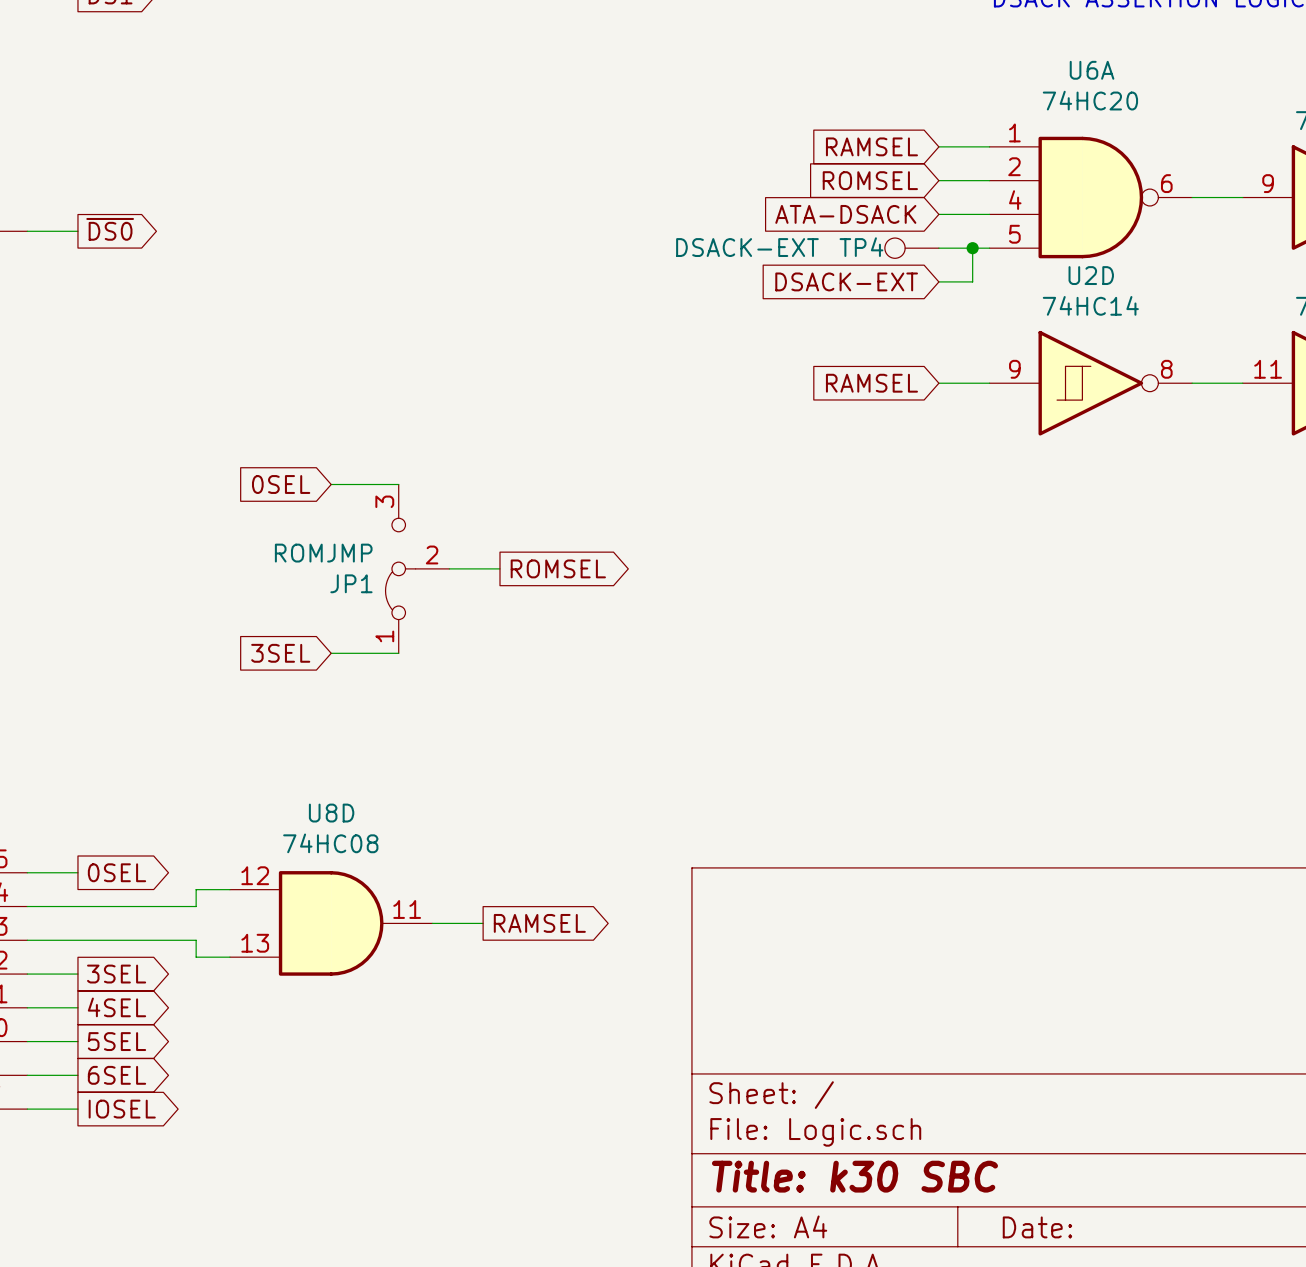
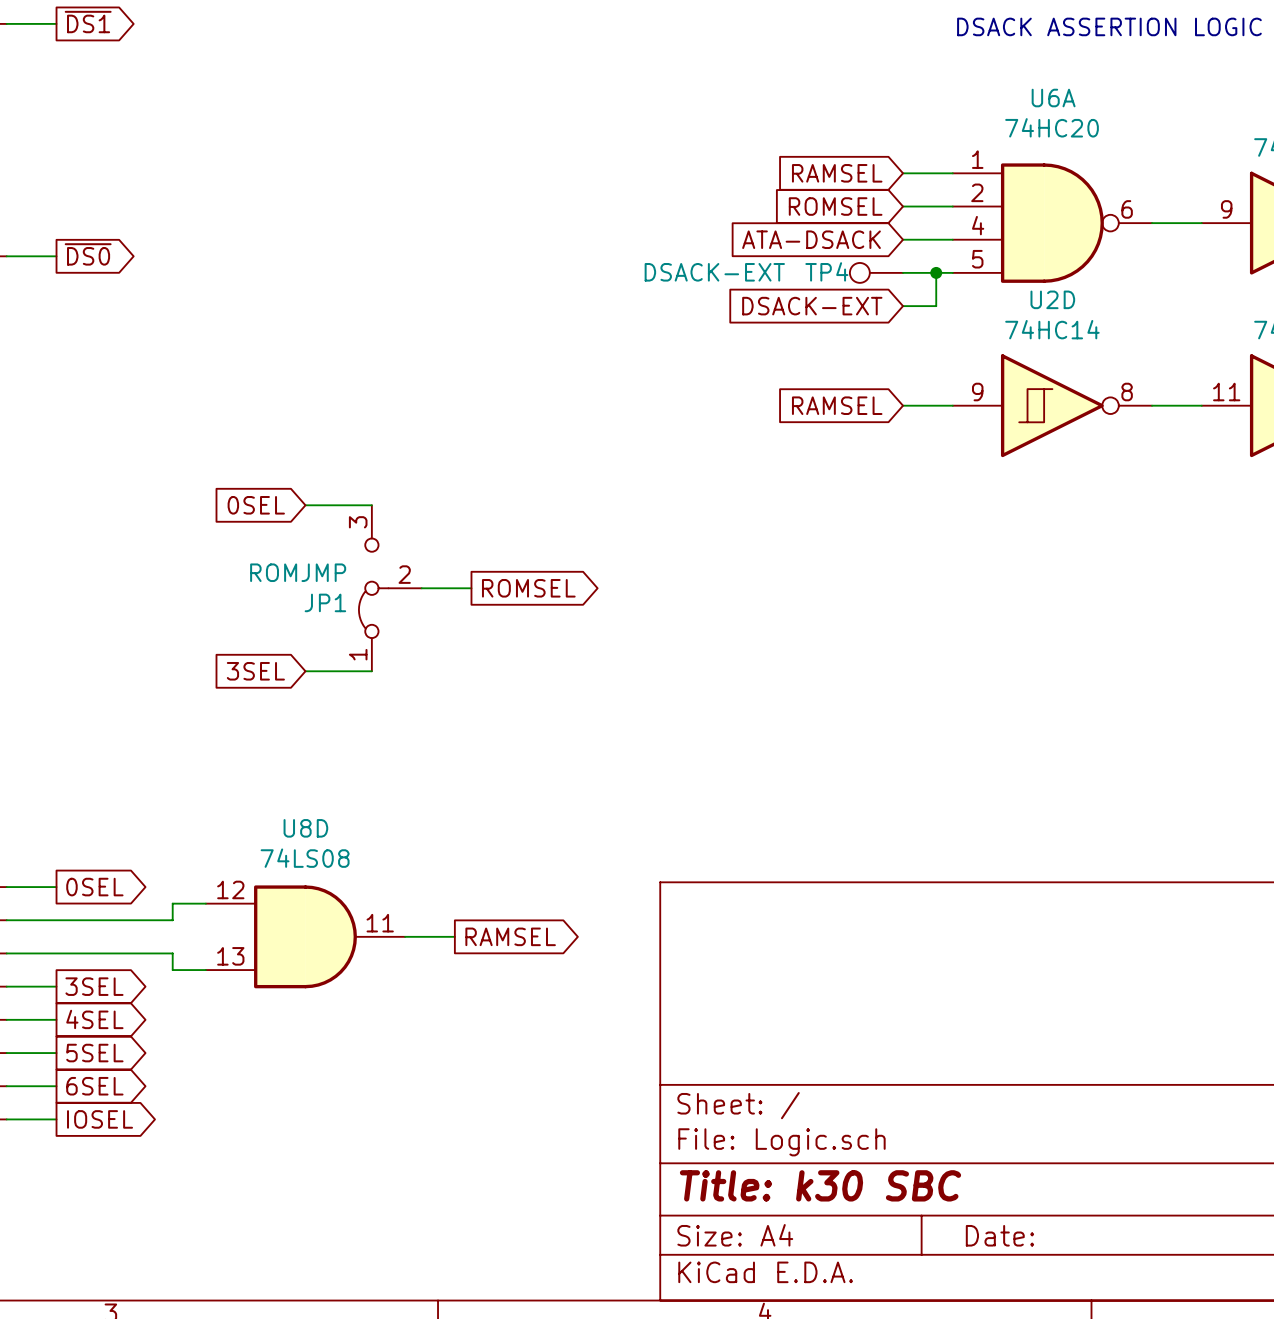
U8D value: 74HC08 (330, 843) -> 74LS08 (305, 858)

